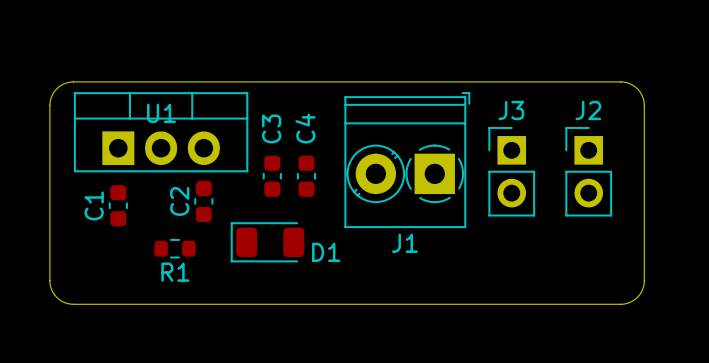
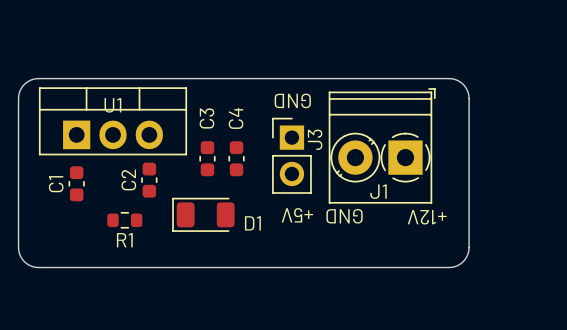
board edge: (556, 81) (626, 82) (639, 91) (644, 105) (644, 280) (642, 289) (635, 299) (623, 304) (556, 304) -> (449, 78) (456, 80) (463, 84) (467, 90) (469, 98) (468, 250) (466, 257) (461, 263) (449, 267)
text: none -> GND (292, 100)
J3 name rotation: 0° (511, 110) -> 90° counterclockwise (315, 139)
J3 name position: J3 (511, 110) -> J3 (315, 139)
J1 position: (407, 160) -> (382, 145)
J3 position: (511, 171) -> (291, 155)
J2: (588, 171) -> none
text: none -> +5V (297, 215)
J1 name position: J1 (404, 243) -> J1 (378, 191)
text: none -> GND (344, 216)
text: none -> +12V (427, 217)

